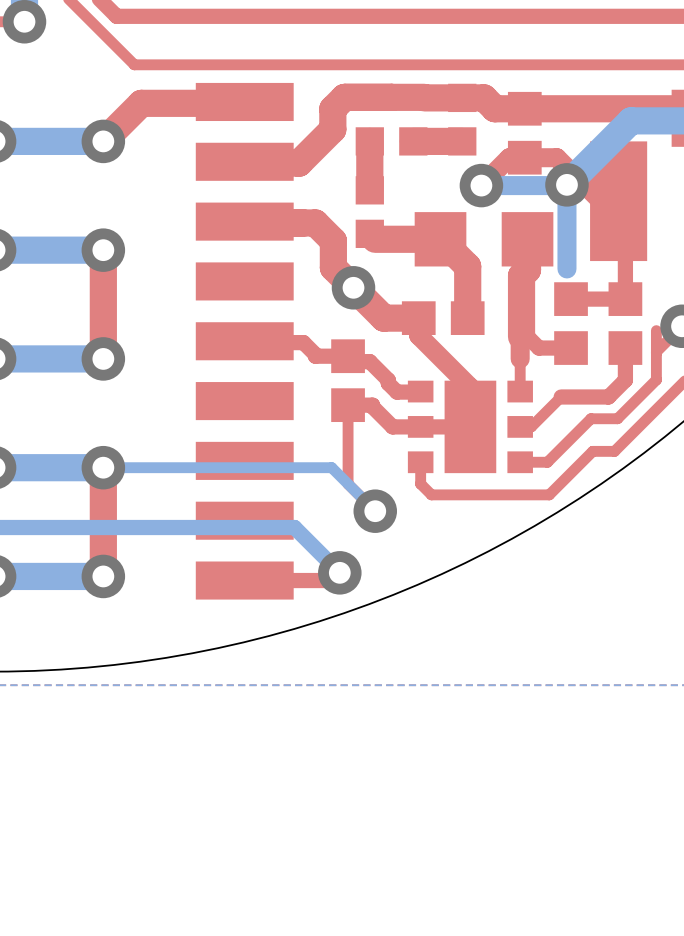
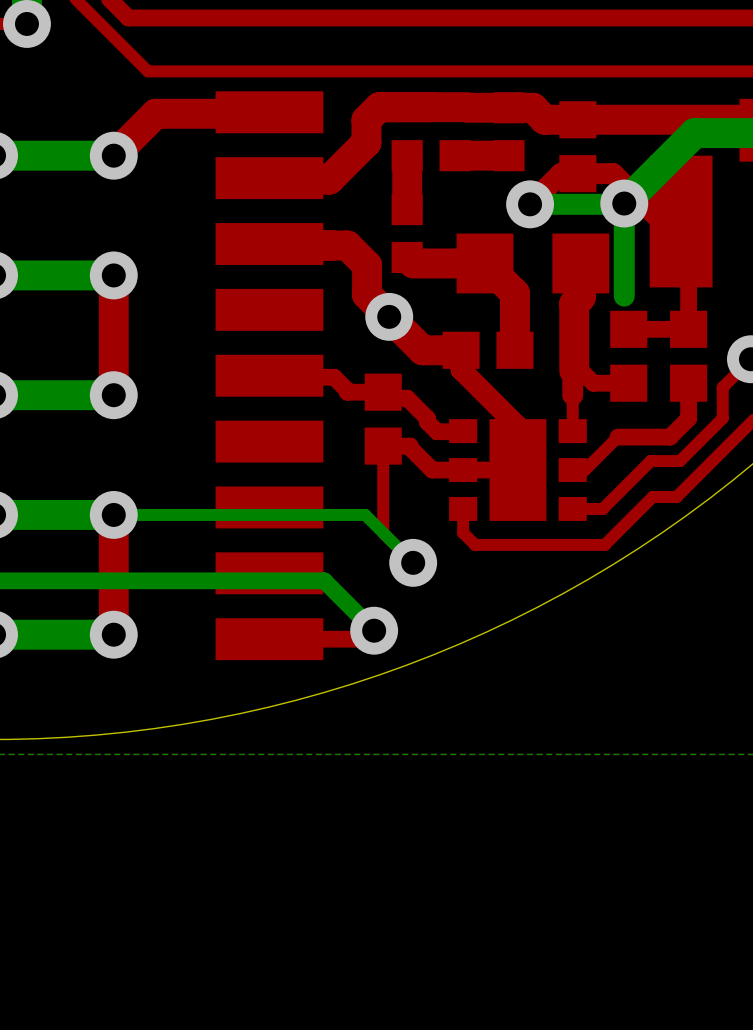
top track: (656, 330) (656, 351) -> none

